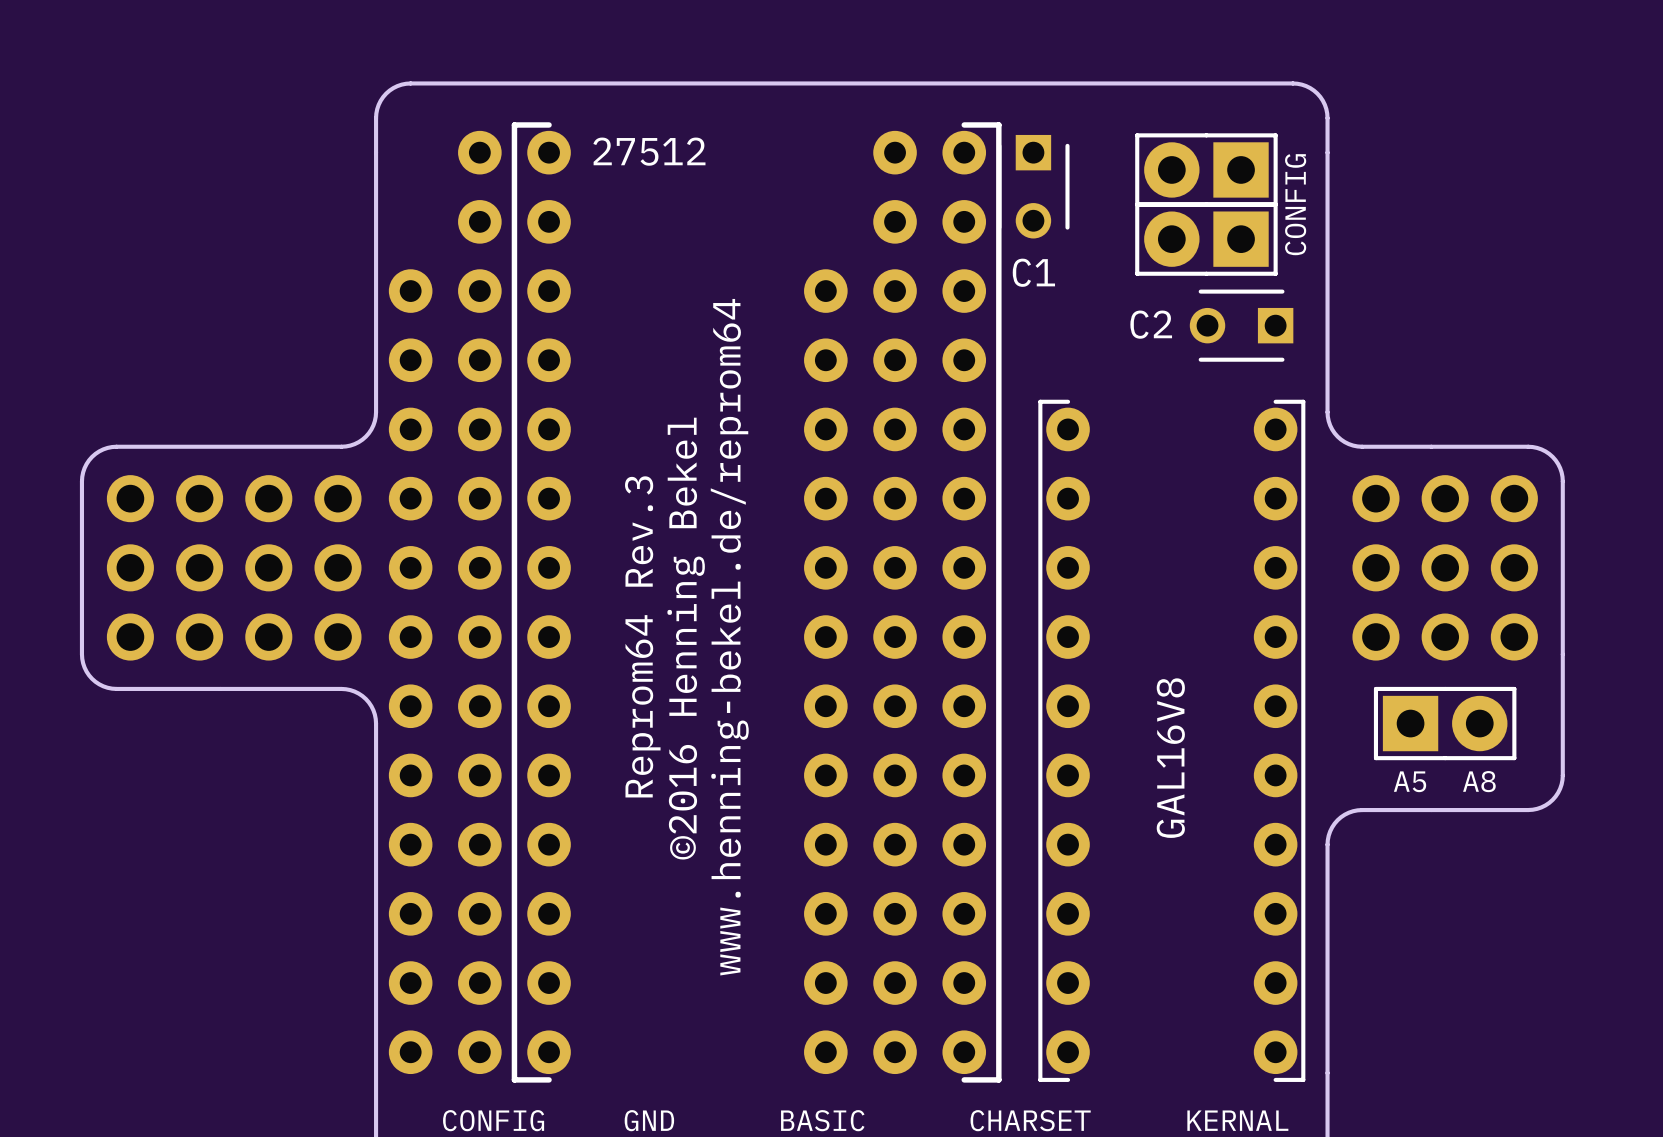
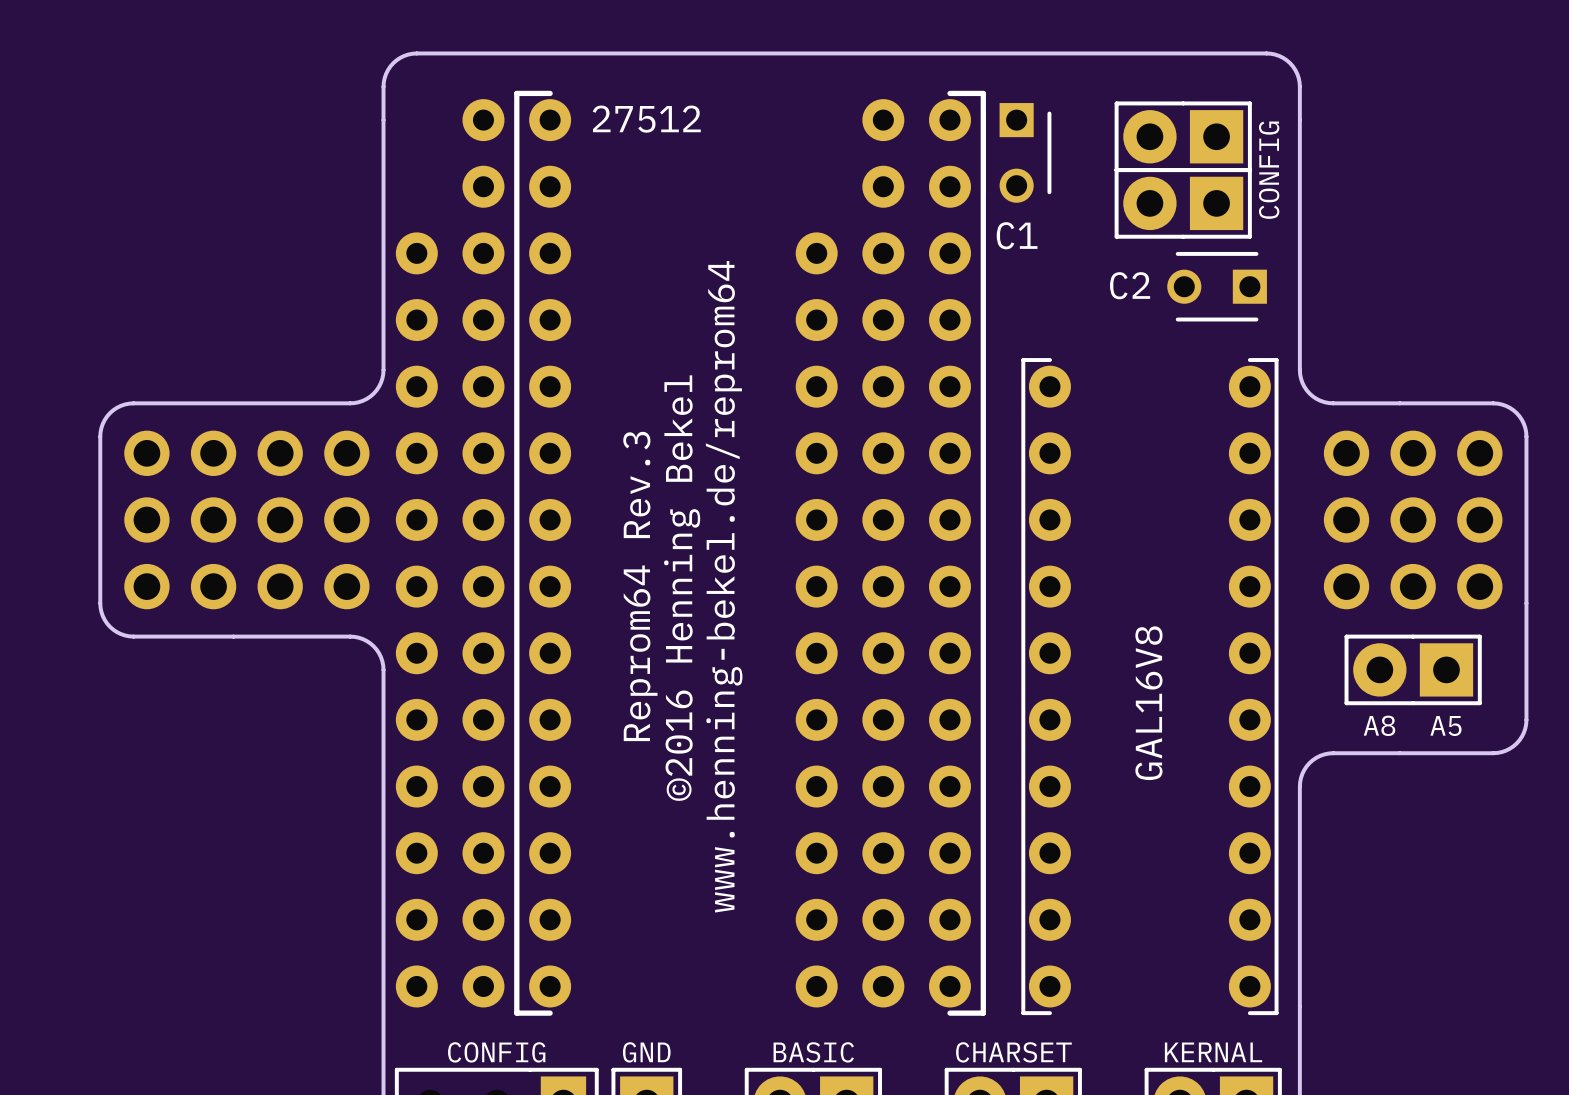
part rotation: 0° (1445, 723) -> 180° (1413, 669)
text: A5 (1410, 781) -> A8 (1379, 725)
text: A8 (1479, 781) -> A5 (1445, 725)

